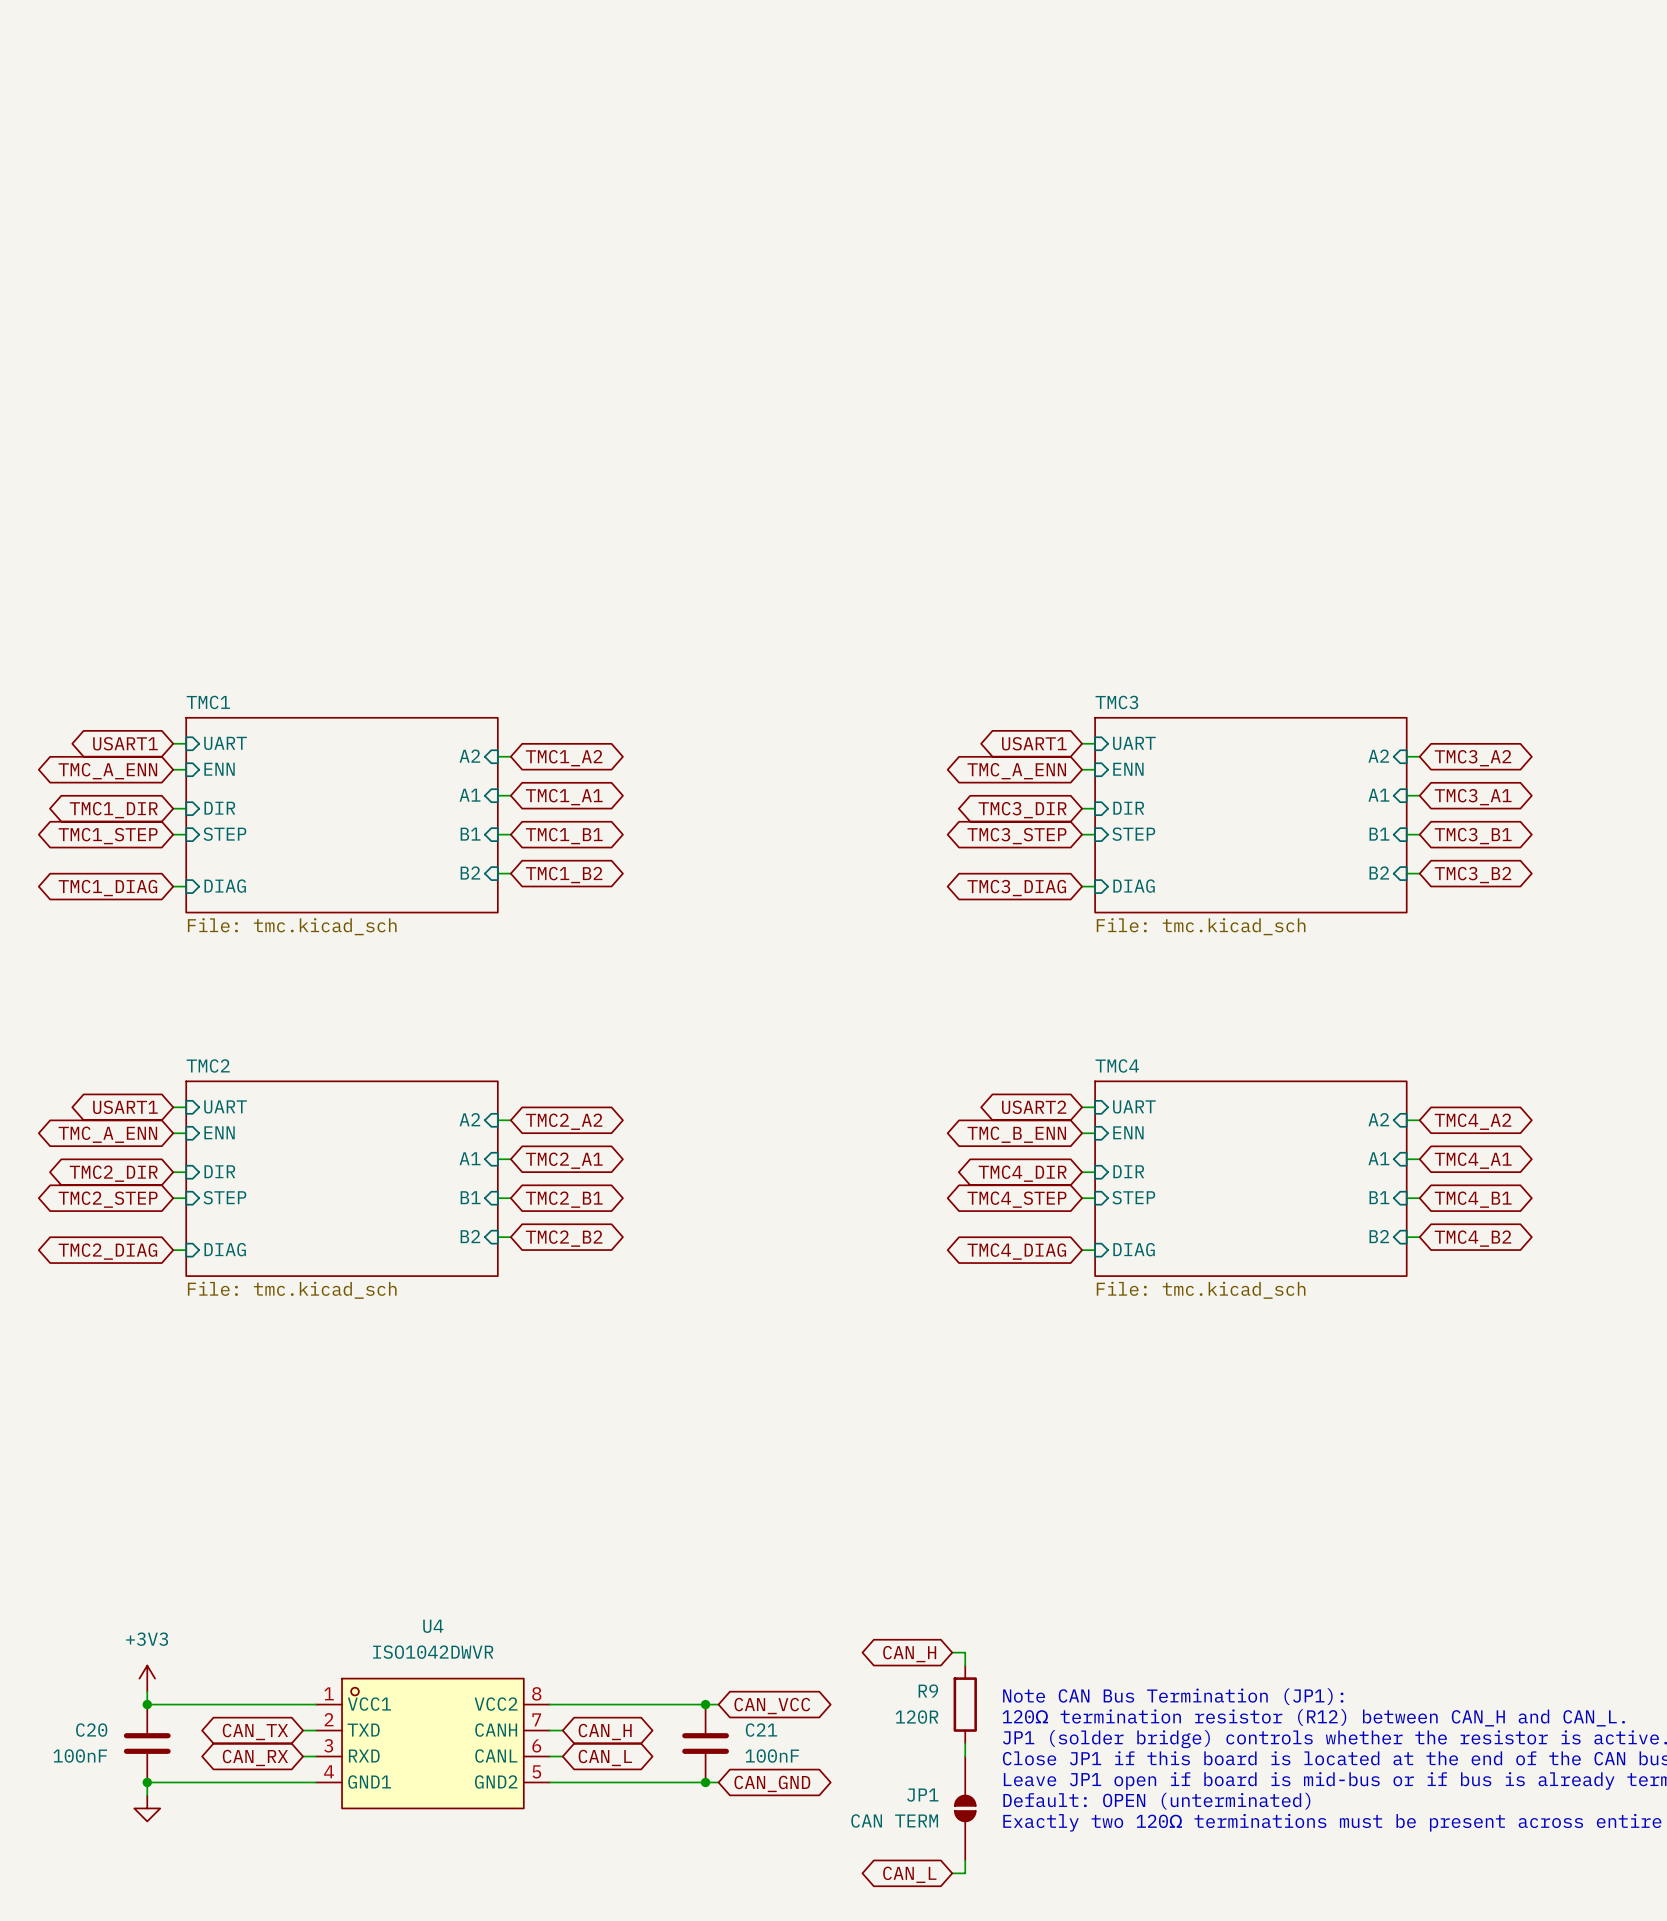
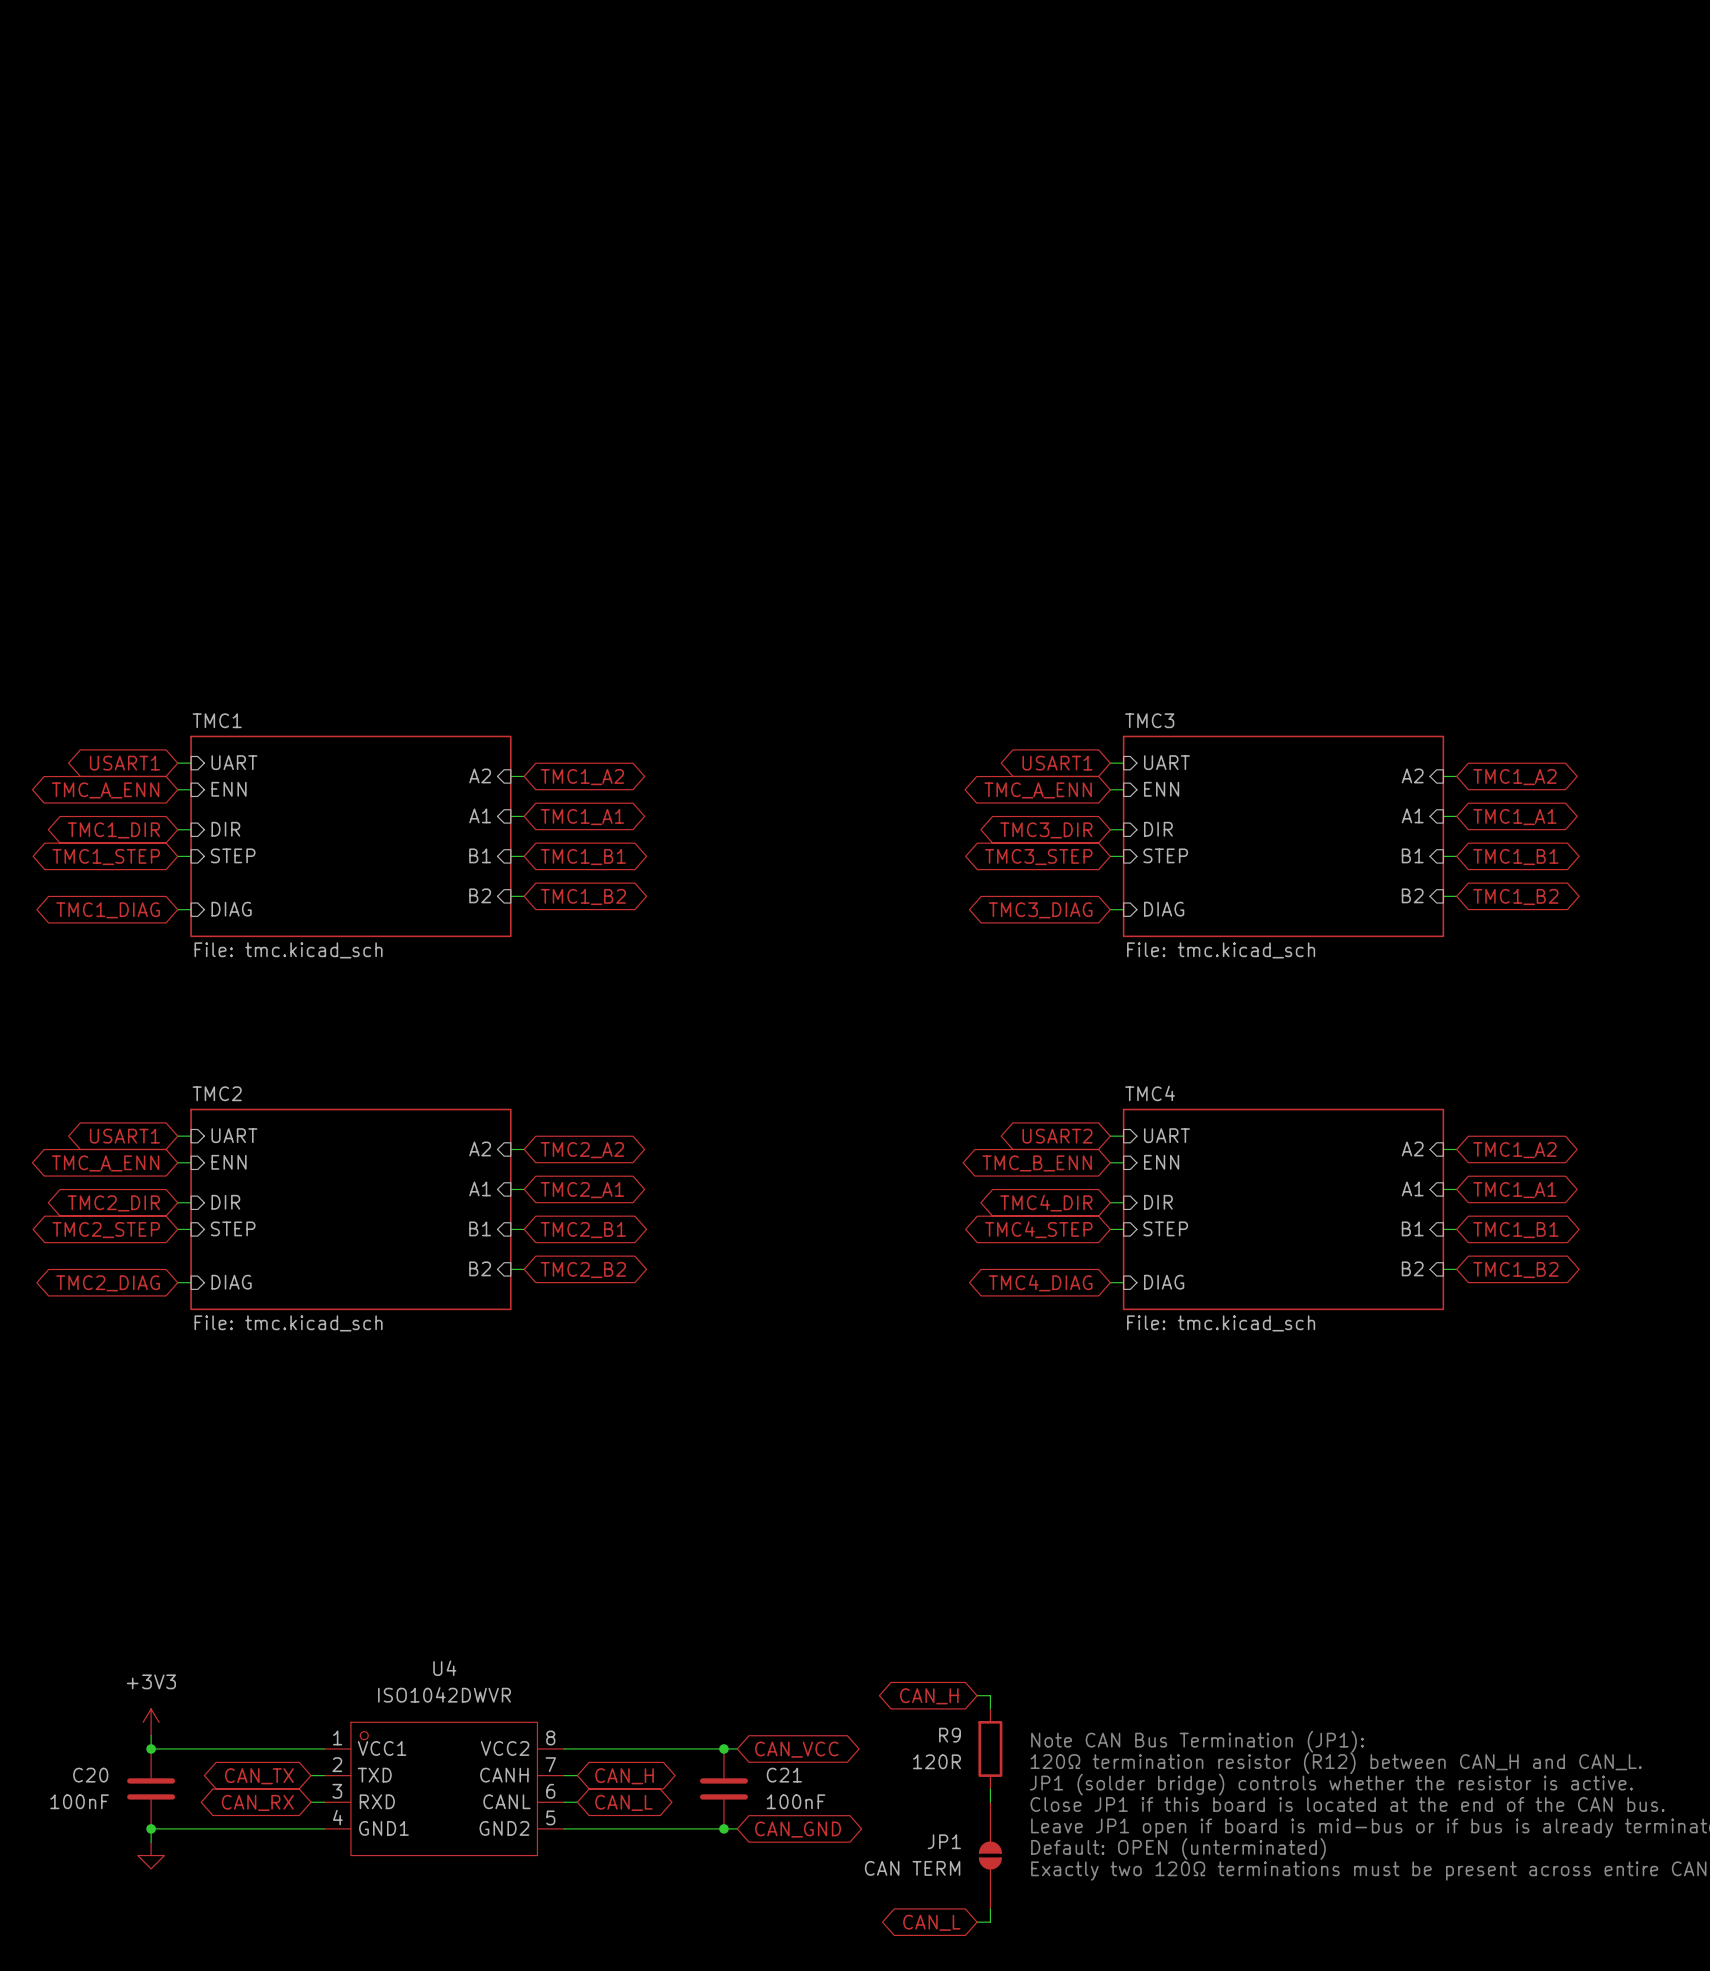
global label: TMC3_A2 (1473, 758) -> TMC1_A2 (1514, 777)
global label: TMC3_A1 (1473, 797) -> TMC1_A1 (1514, 817)
global label: TMC3_B1 (1473, 836) -> TMC1_B1 (1515, 857)
global label: TMC3_B2 (1473, 875) -> TMC1_B2 (1515, 896)
global label: TMC4_A2 (1473, 1121) -> TMC1_A2 (1514, 1150)
global label: TMC4_A1 (1473, 1160) -> TMC1_A1 (1514, 1190)
global label: TMC4_B1 (1473, 1199) -> TMC1_B1 (1515, 1230)
global label: TMC4_B2 (1473, 1238) -> TMC1_B2 (1515, 1270)

